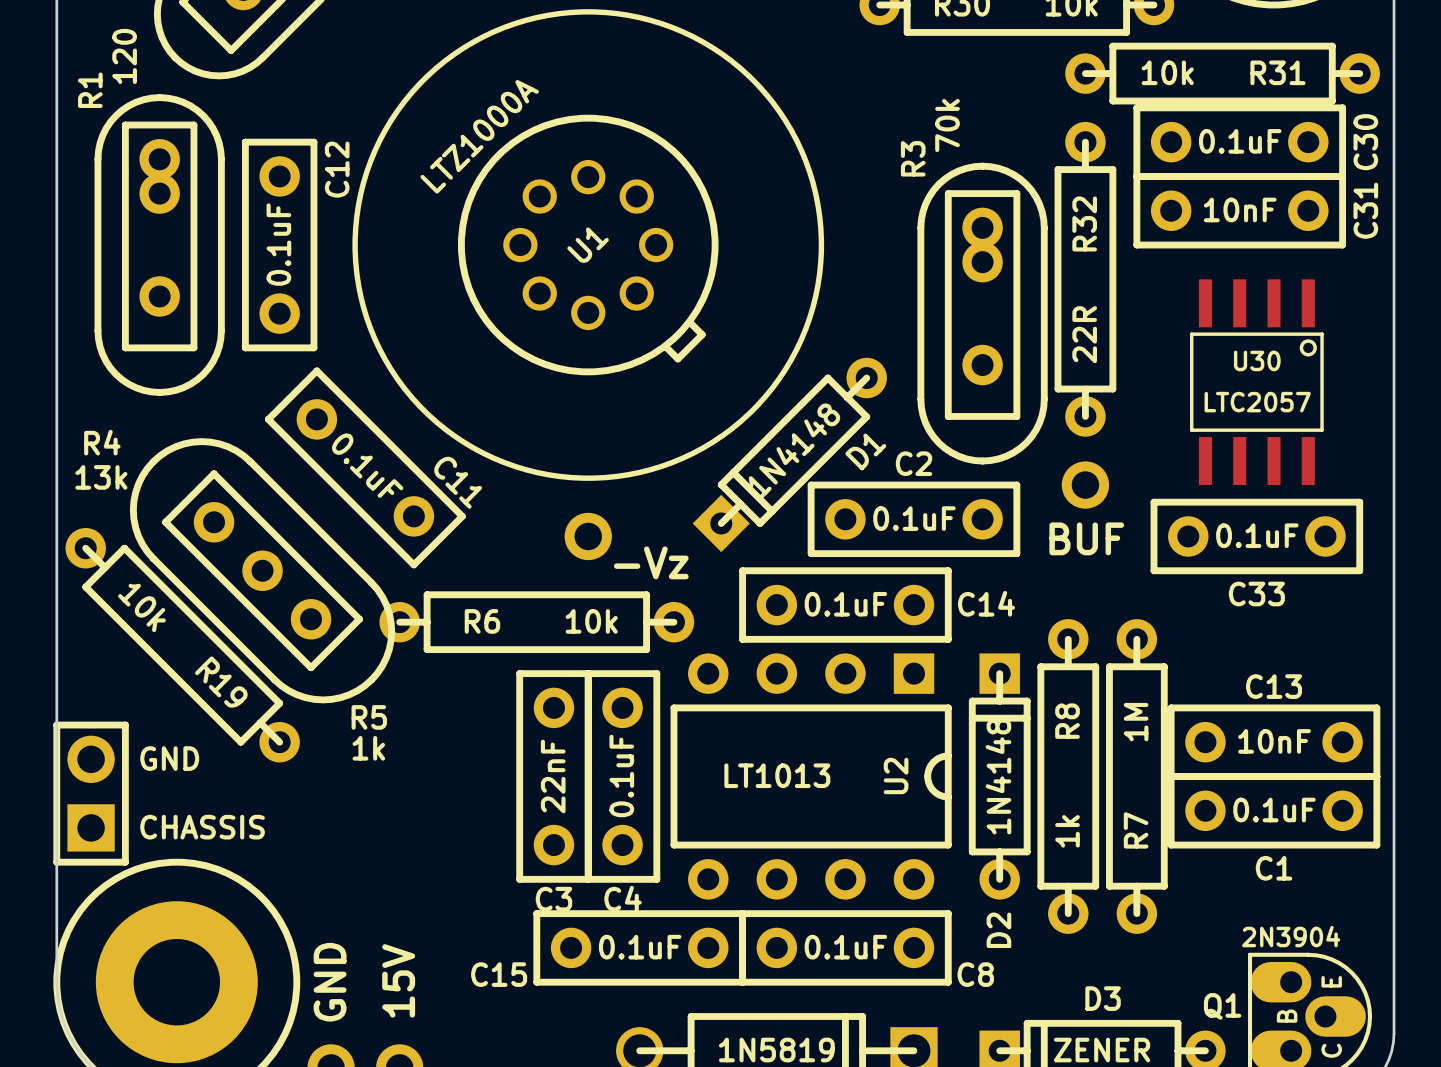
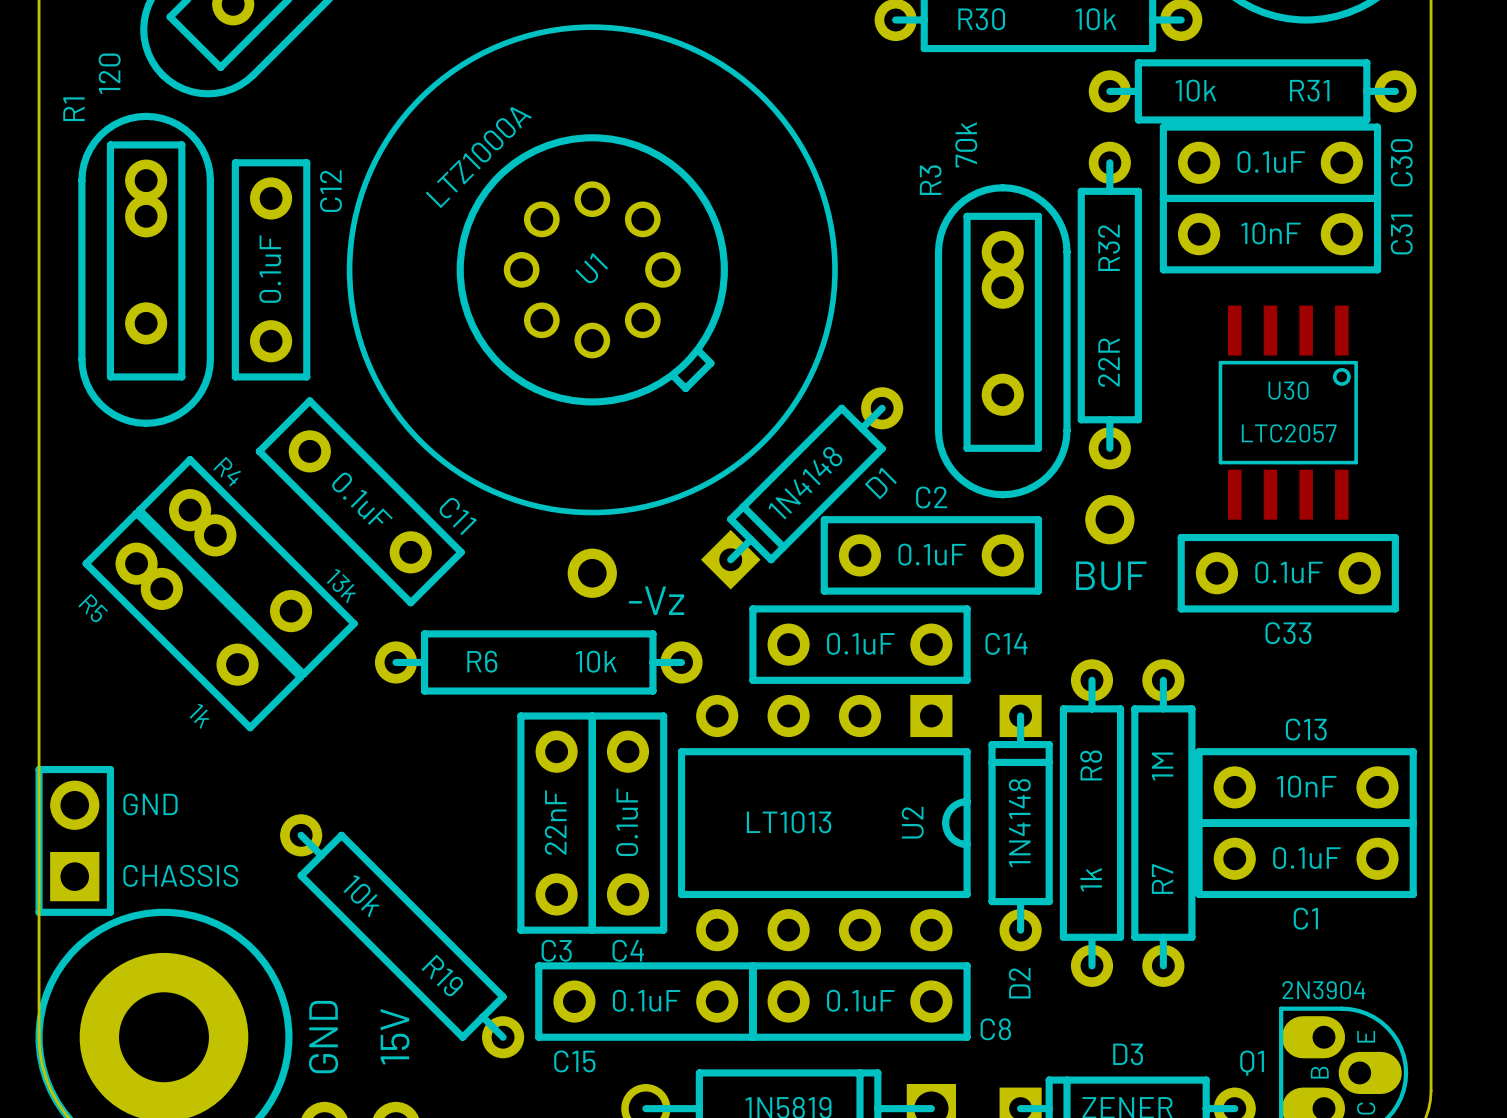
text: R4 (102, 442) -> none
text: 13k (101, 477) -> none
R4: none -> 13k (246, 566)
part: (262, 570) -> none
R5: none -> 1k (193, 620)
R19 position: (182, 645) -> (402, 936)
text: R5 (369, 717) -> none
text: 1k (368, 748) -> none
C15 name position: C15 (499, 974) -> C15 (574, 1061)

